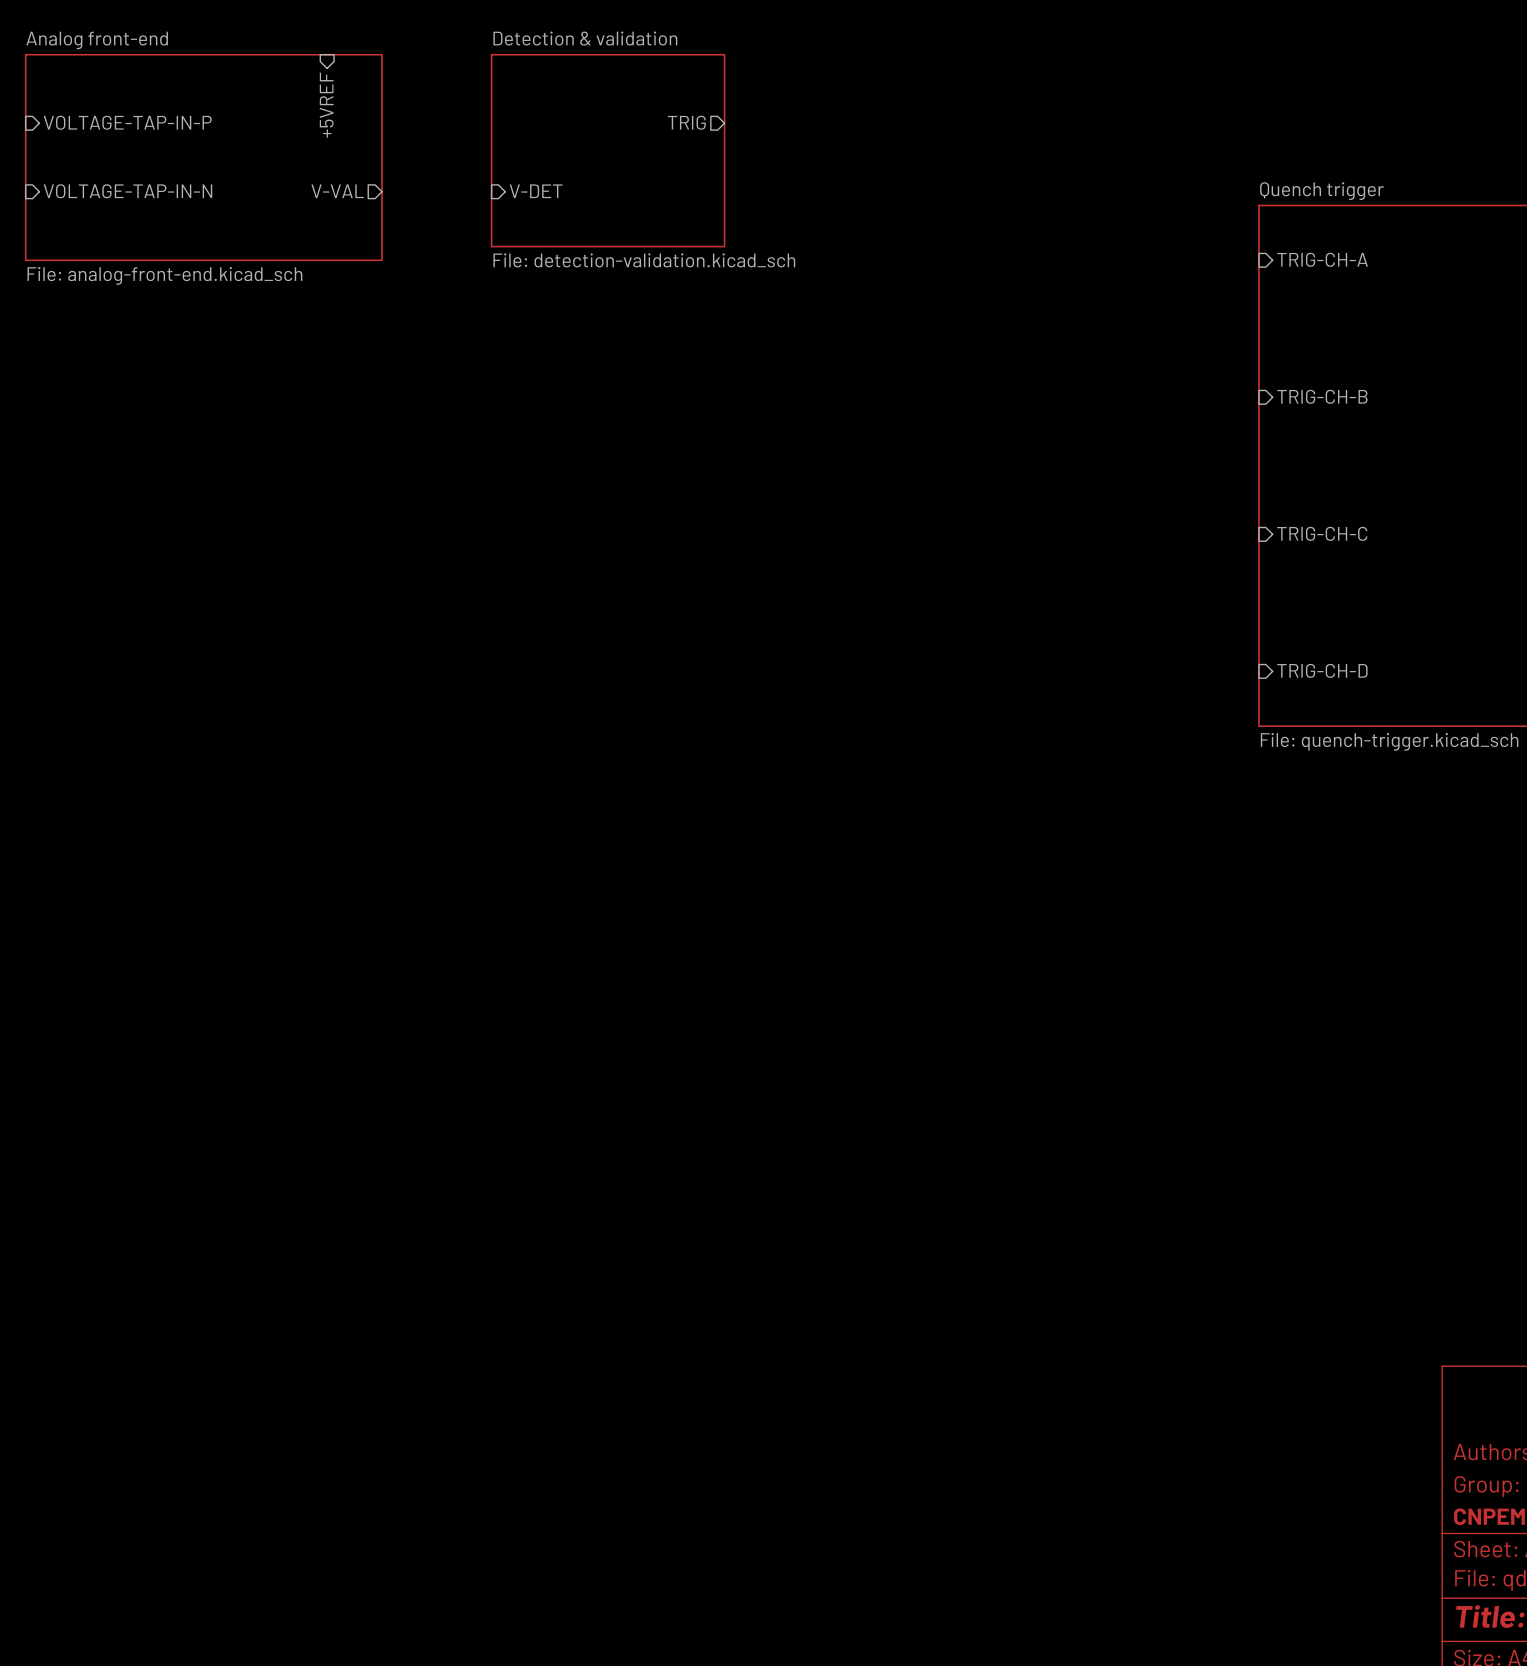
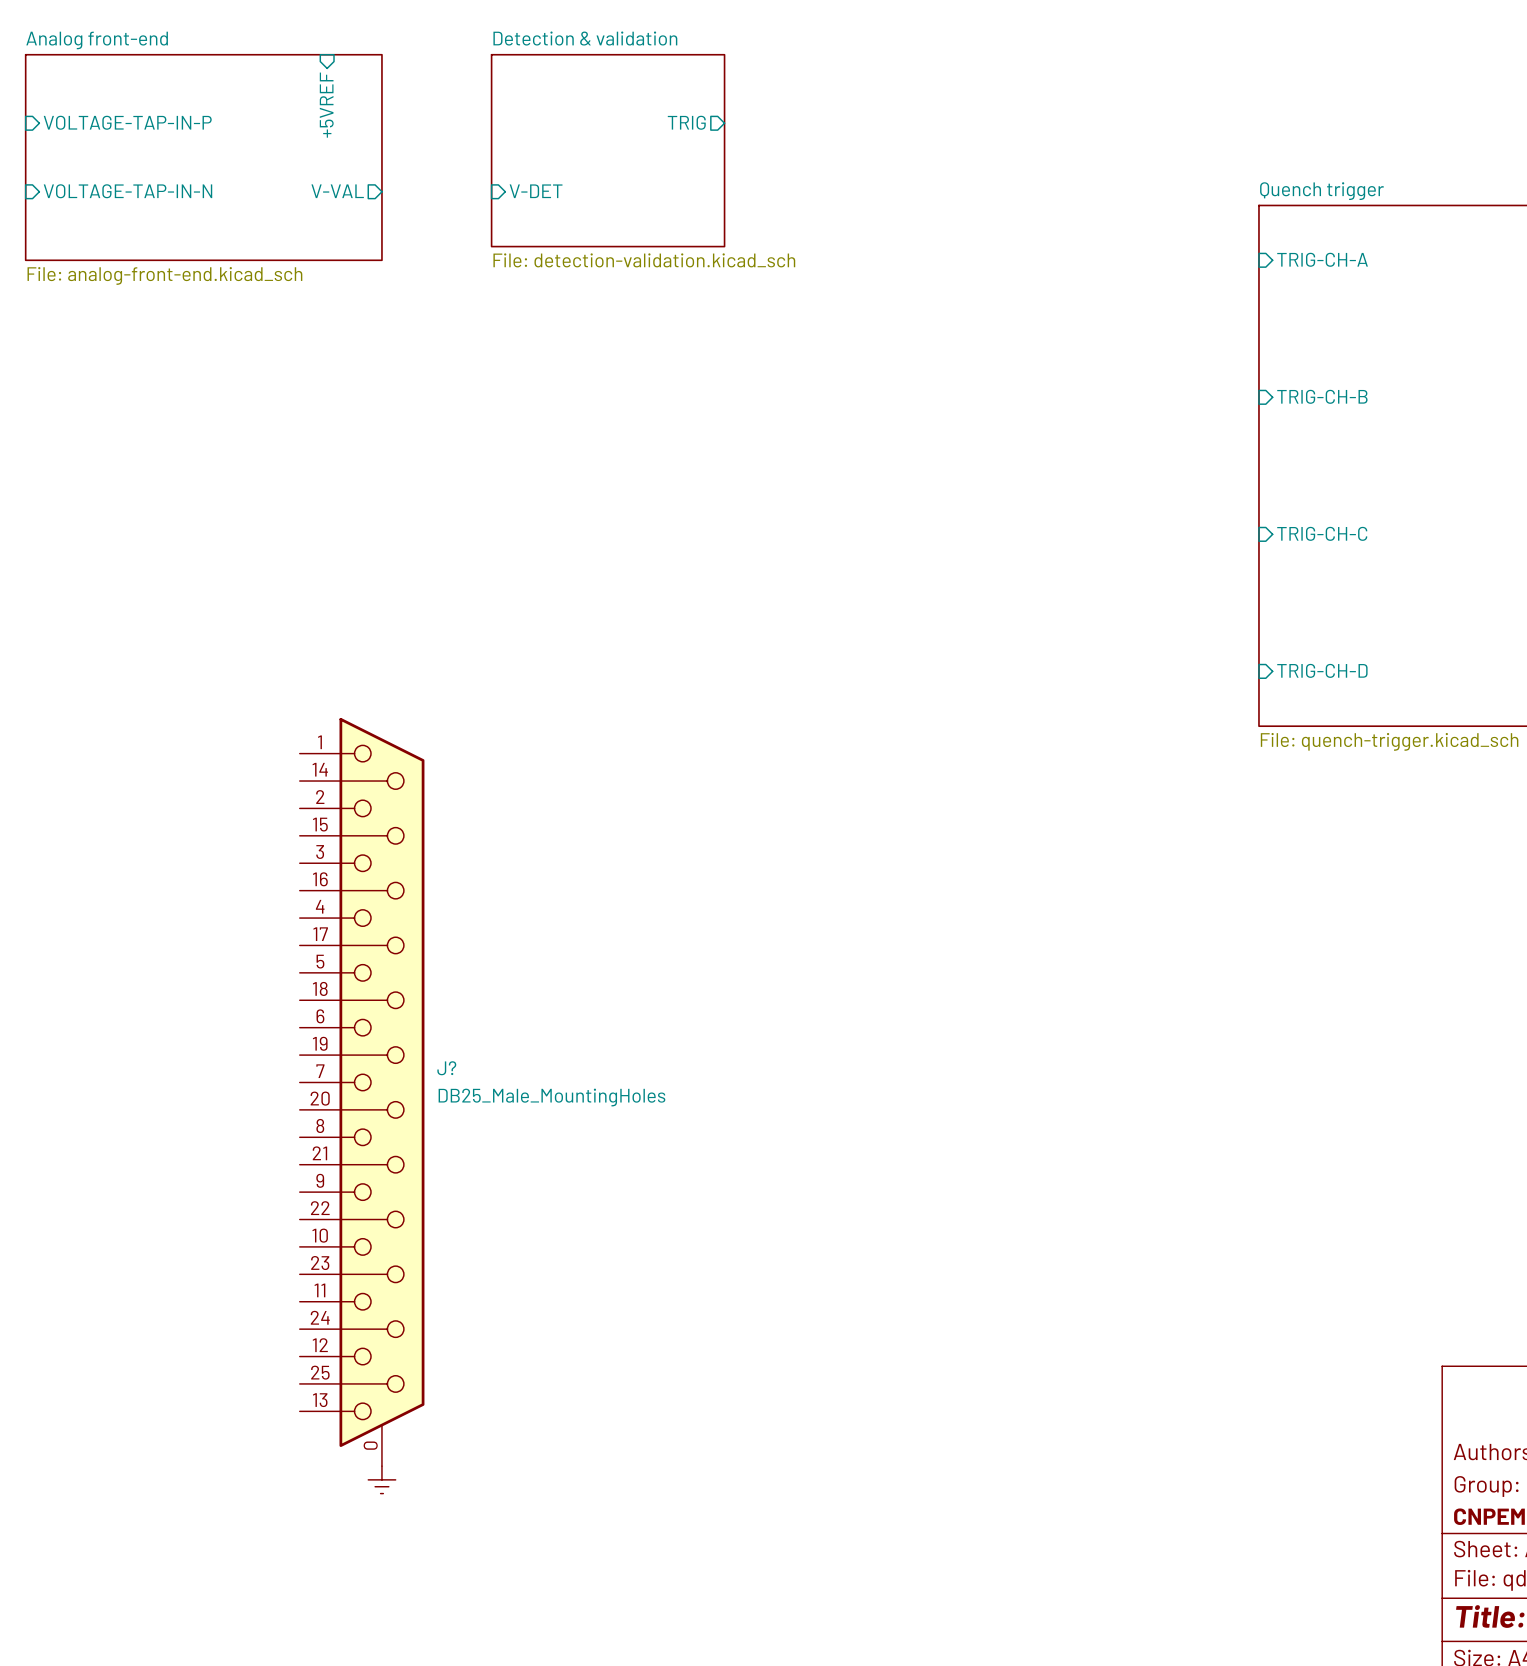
J?: none -> DB25_Male_MountingHoles (362, 1092)
power symbol: none -> (381, 1479)

